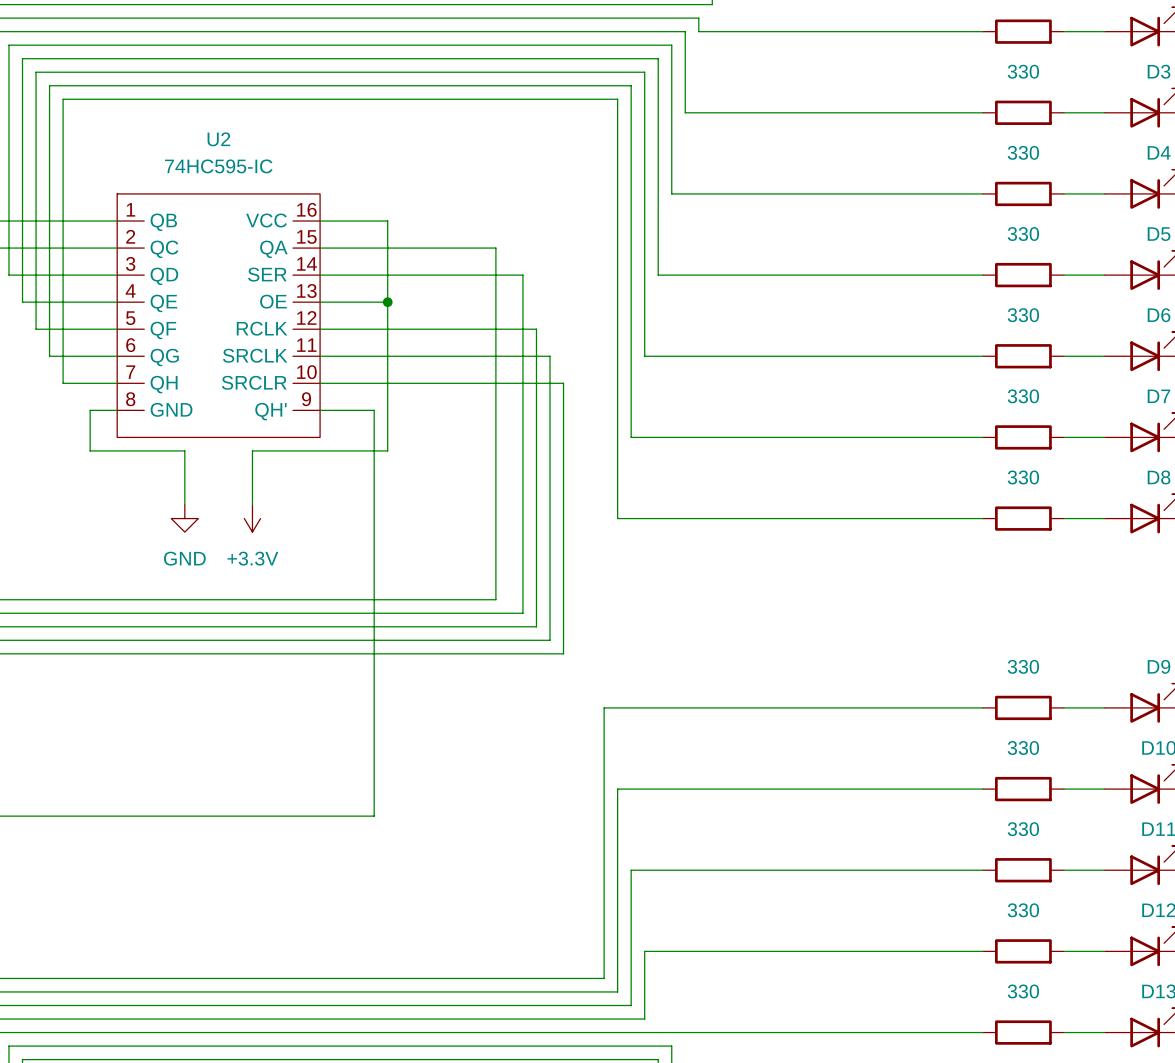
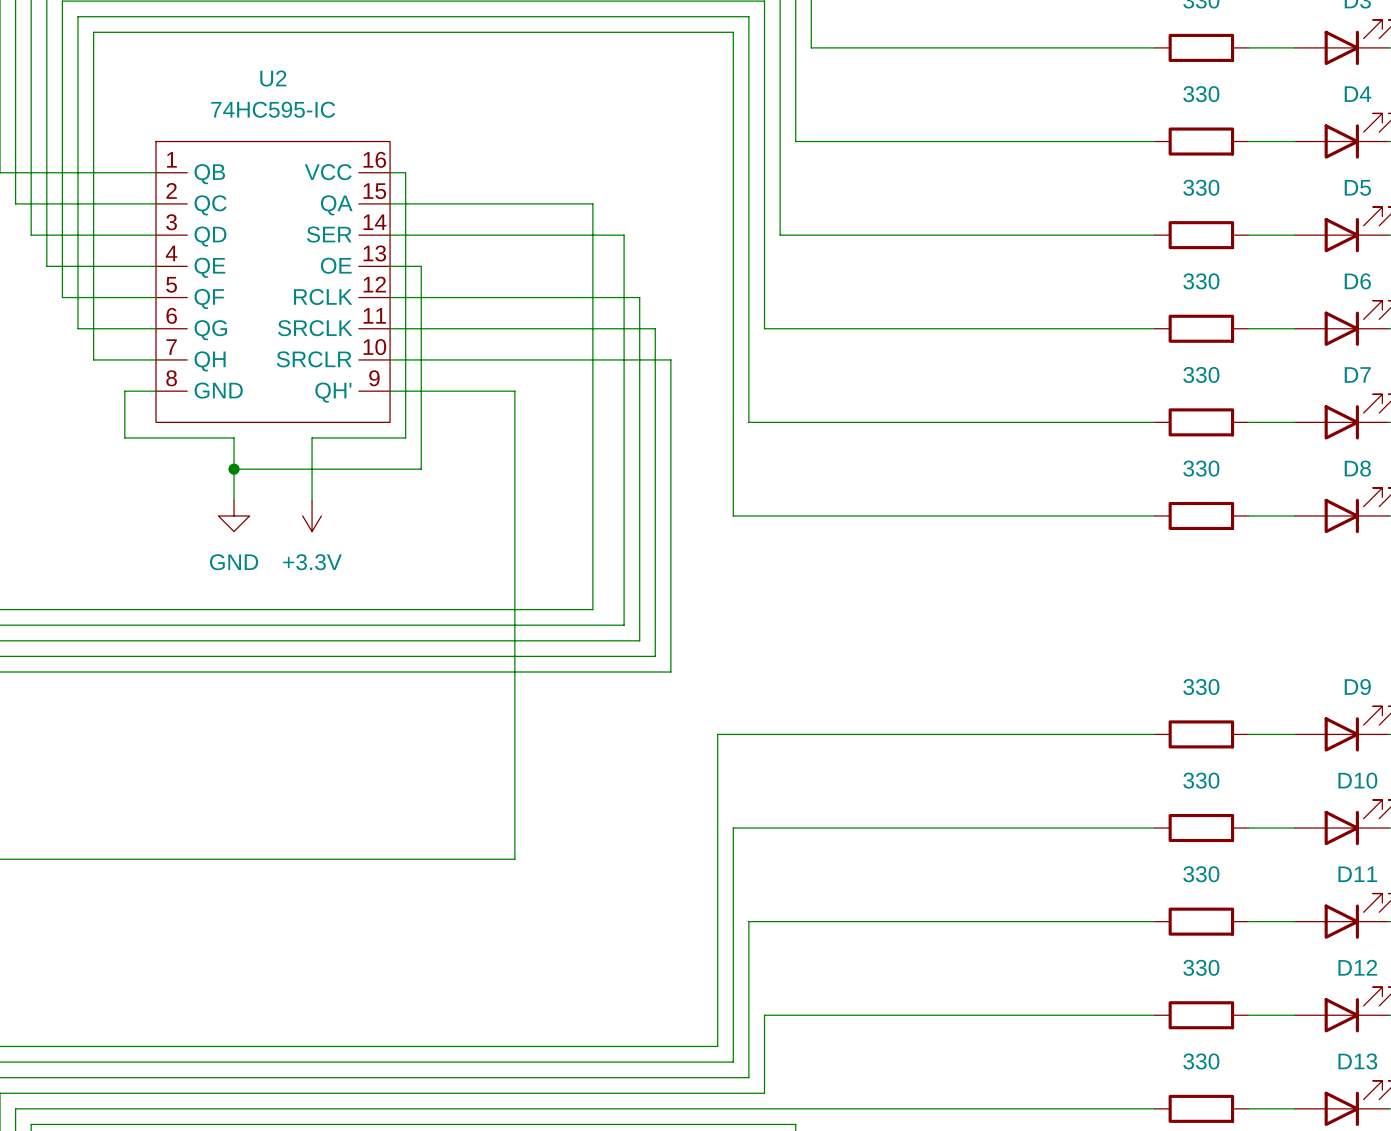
wire: (333, 221) (387, 221) (387, 450) (333, 450) -> (405, 172) (405, 437)
wire: (347, 302) (387, 302) -> (421, 266) (421, 469) (234, 469)
junction: (387, 302) -> none
wire: (374, 410) (374, 816) -> (452, 391) (514, 391) (514, 859) (452, 859)
junction: none -> (234, 469)

